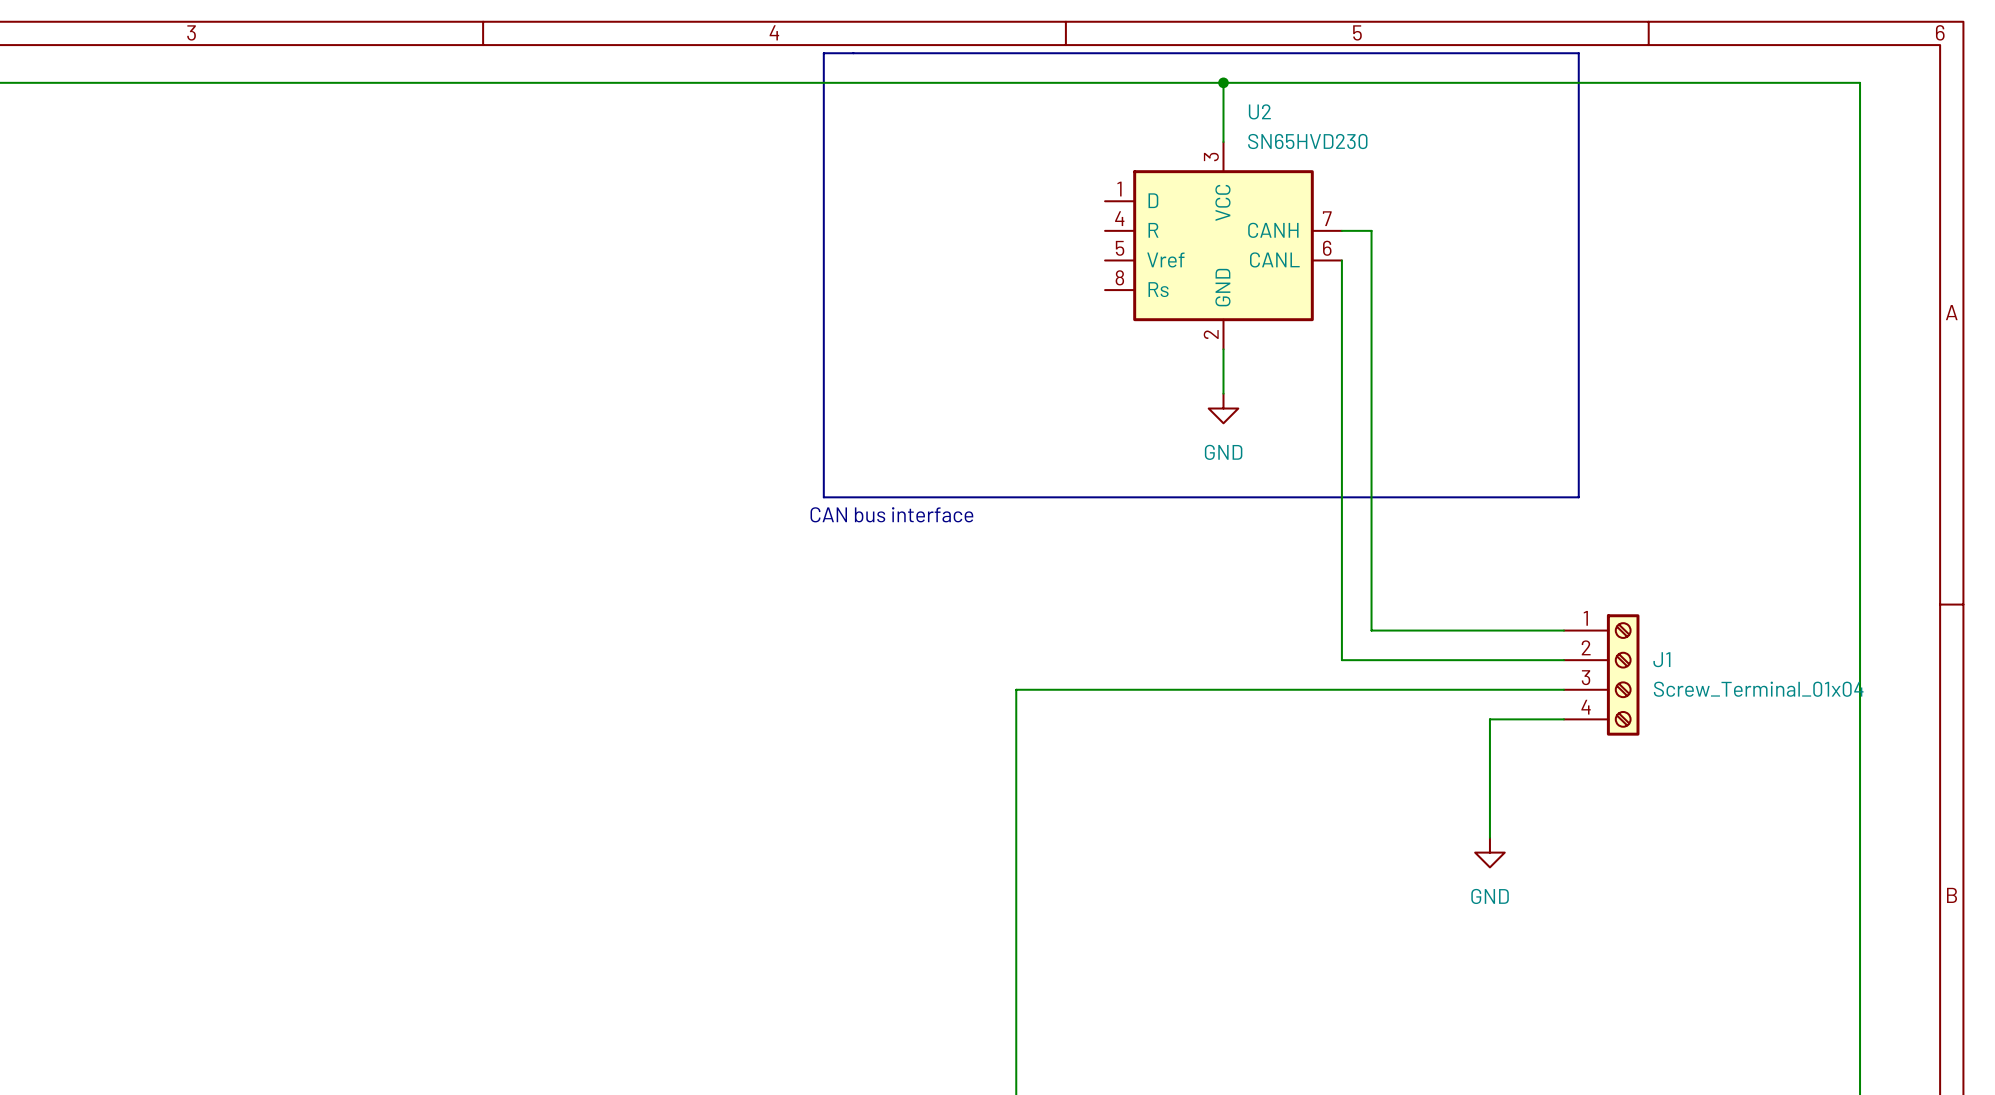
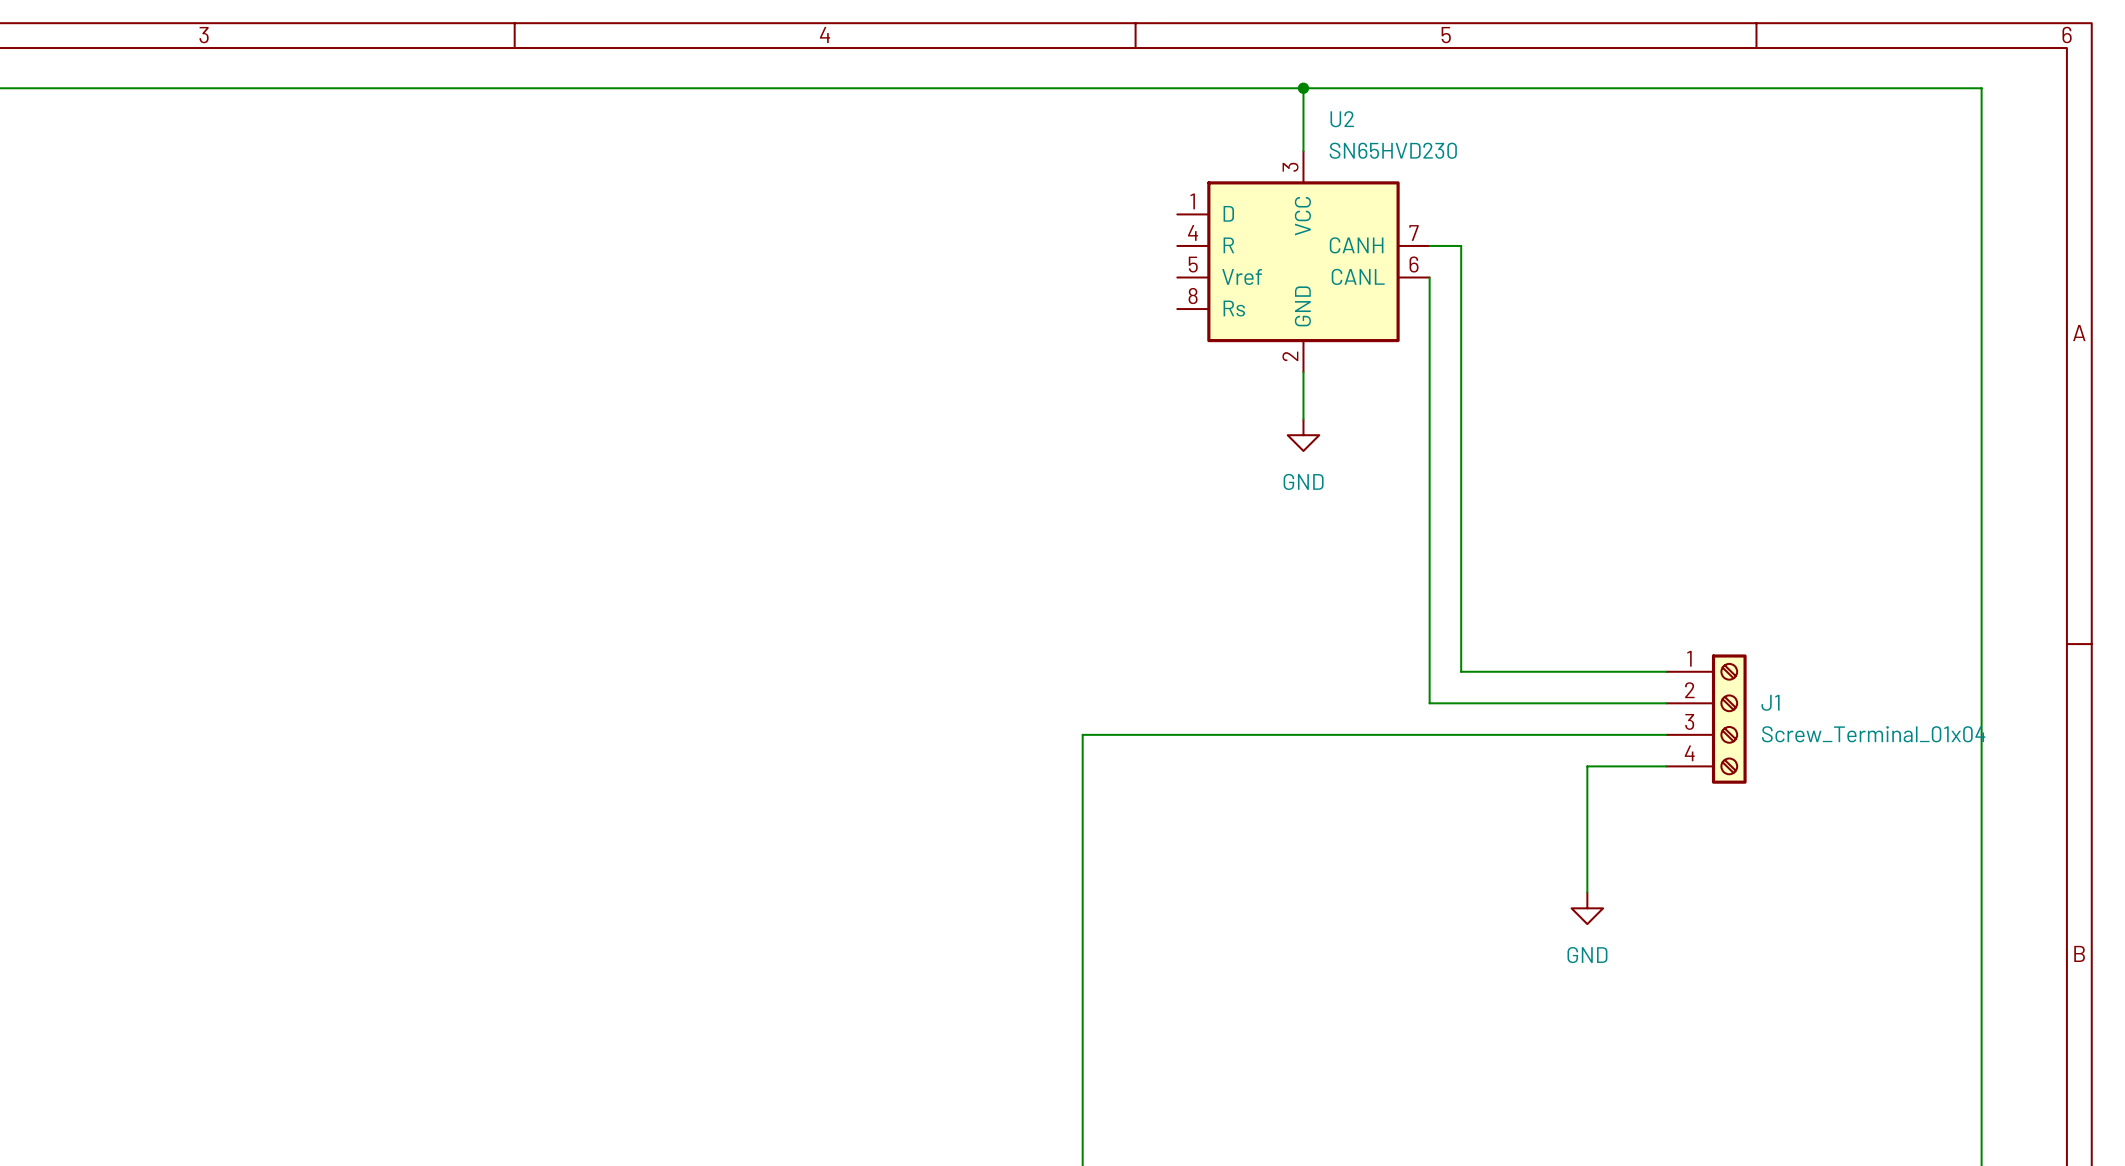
line: (823, 53) (1578, 53) (1578, 497) (823, 497) (823, 53) -> none
text: CAN bus interface (891, 514) -> none

